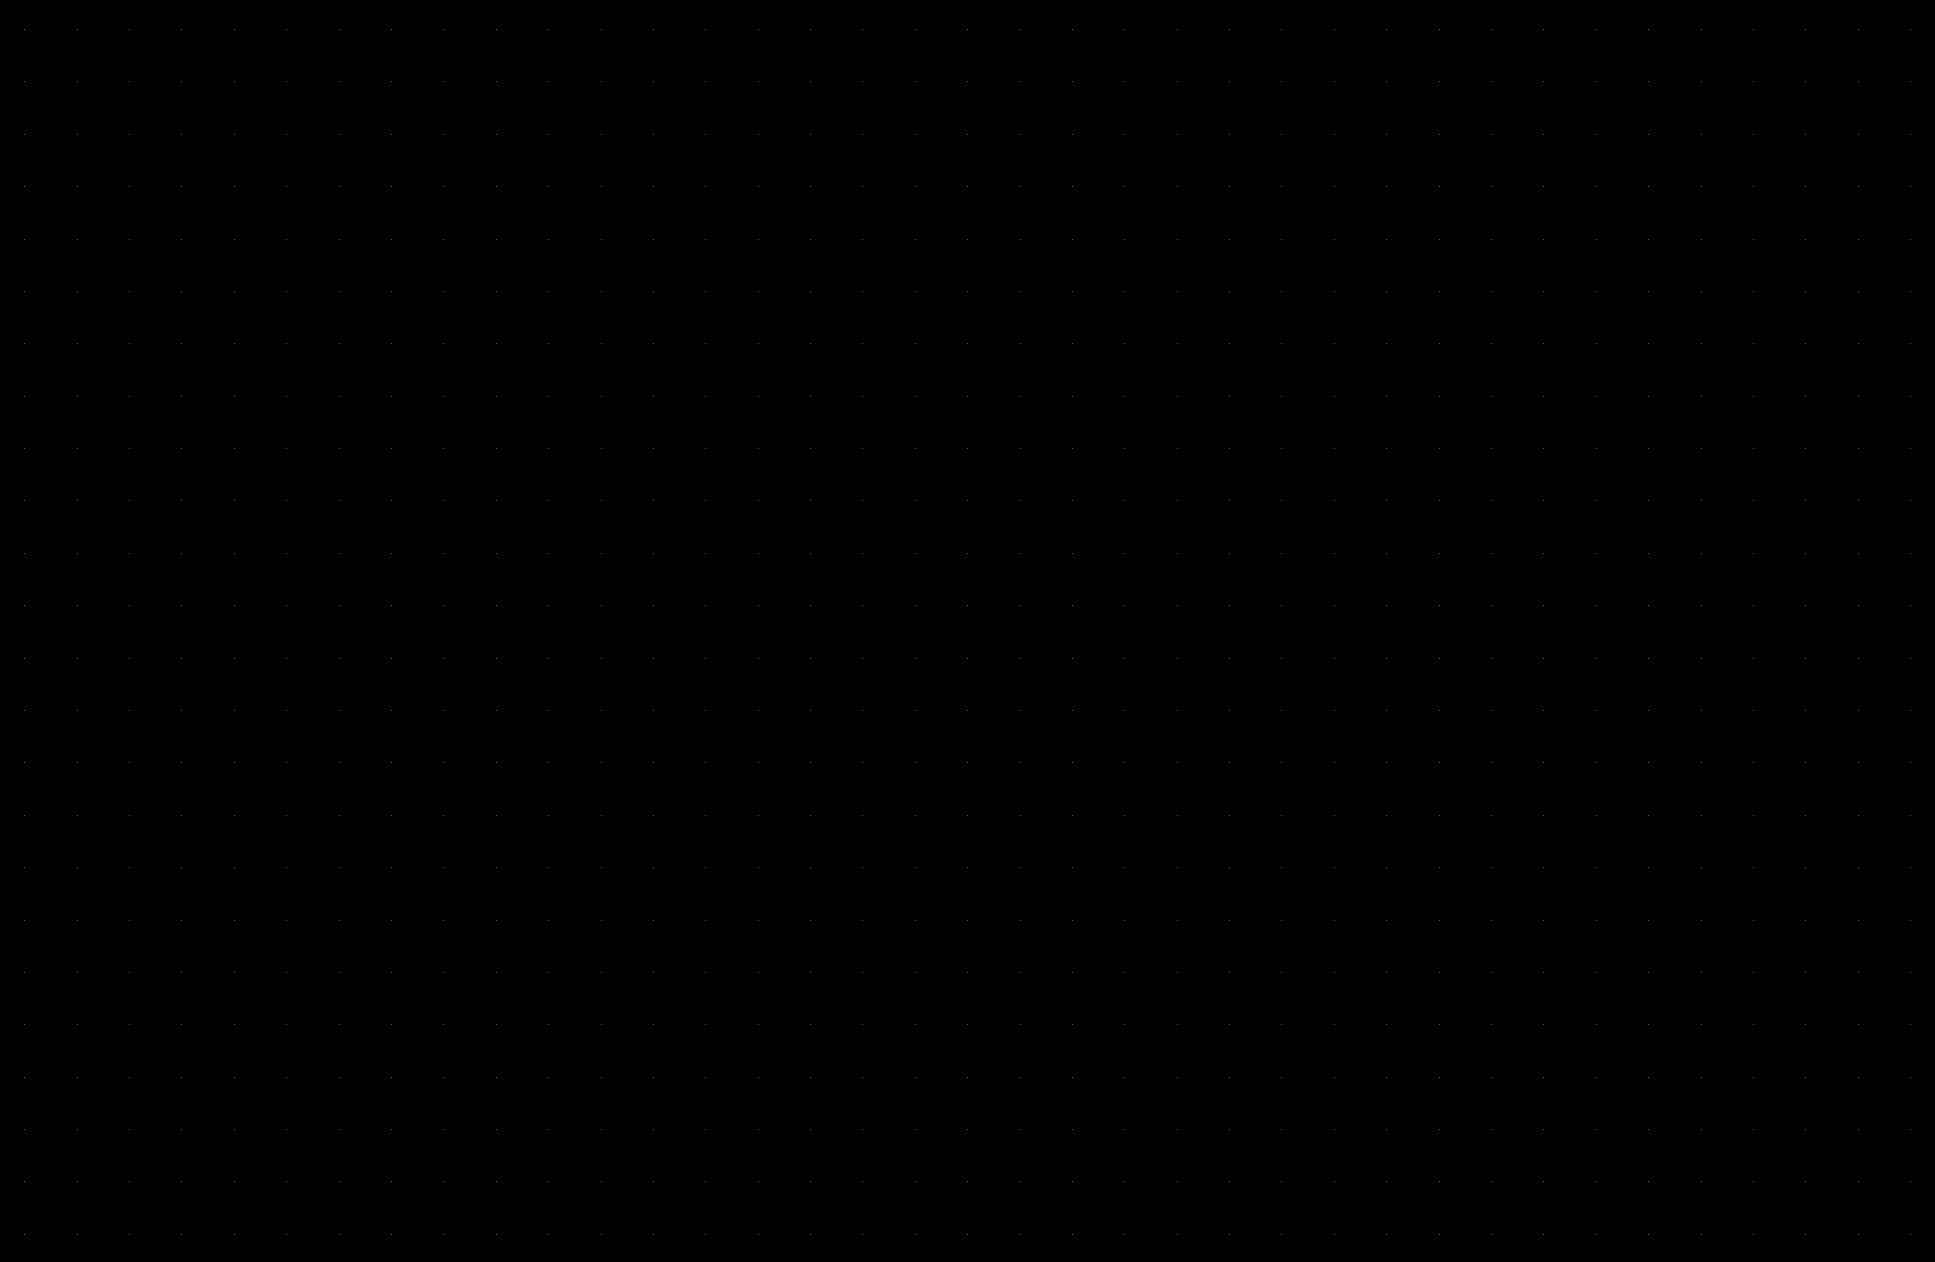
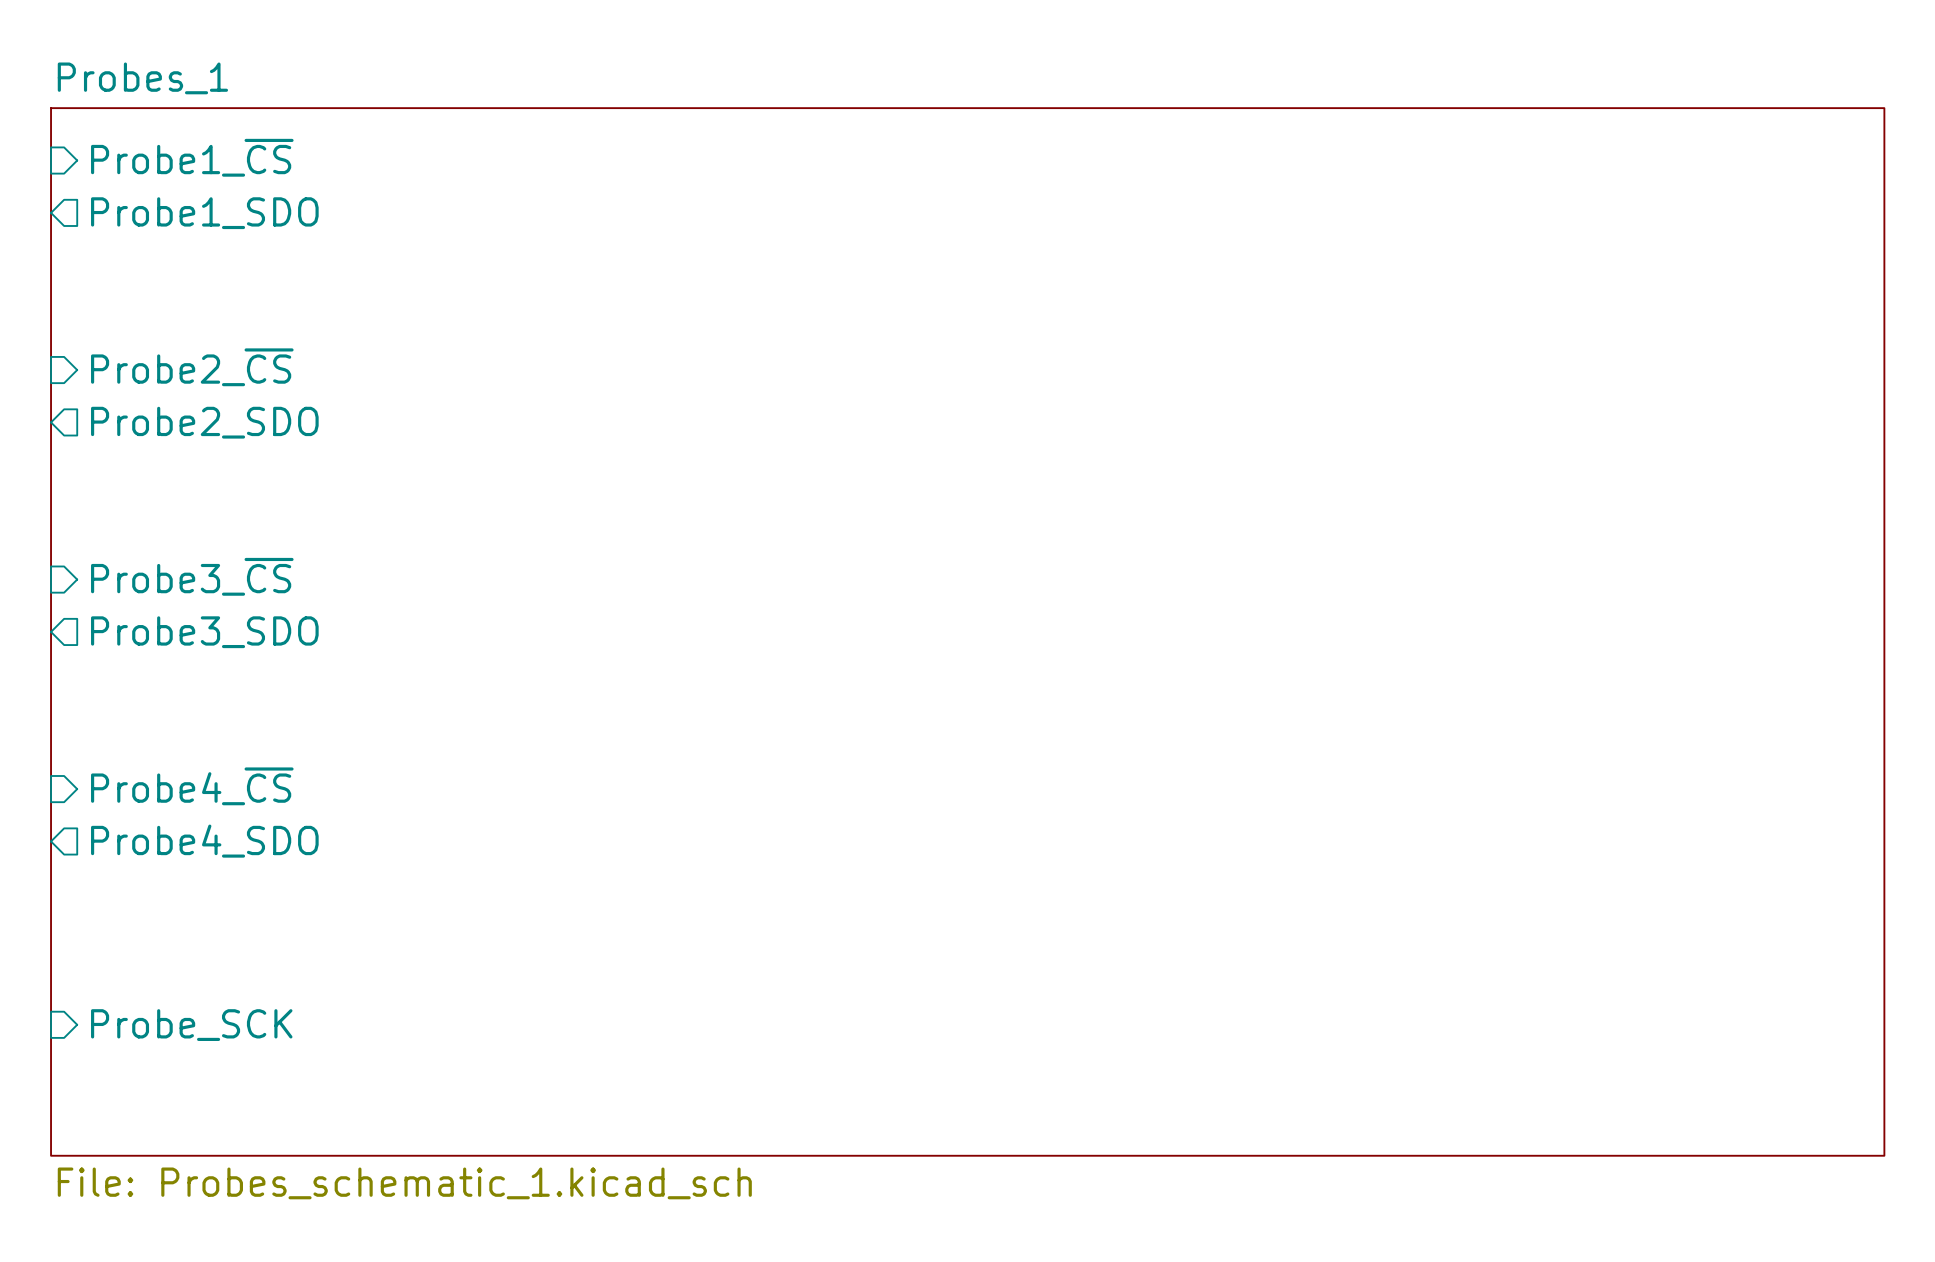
sheet pin: none -> Probe1_~{CS} (192, 157)
sheet pin: none -> Probe1_SDO (204, 213)
sheet pin: none -> Probe2_~{CS} (192, 367)
sheet pin: none -> Probe2_SDO (204, 422)
sheet pin: none -> Probe3_~{CS} (192, 576)
sheet Probes_1: none -> File: Probes_schematic_1.kicad_sch (967, 631)
sheet pin: none -> Probe3_SDO (204, 632)
sheet pin: none -> Probe4_~{CS} (192, 786)
sheet pin: none -> Probe4_SDO (204, 841)
sheet pin: none -> Probe_SCK (191, 1025)

